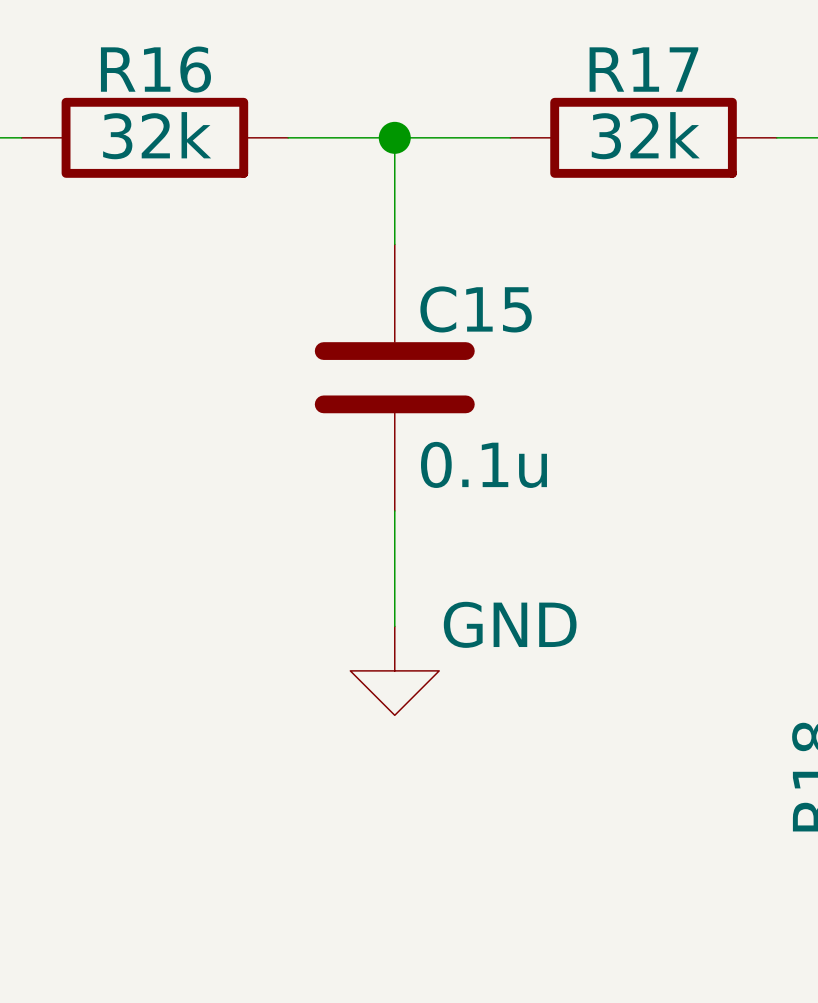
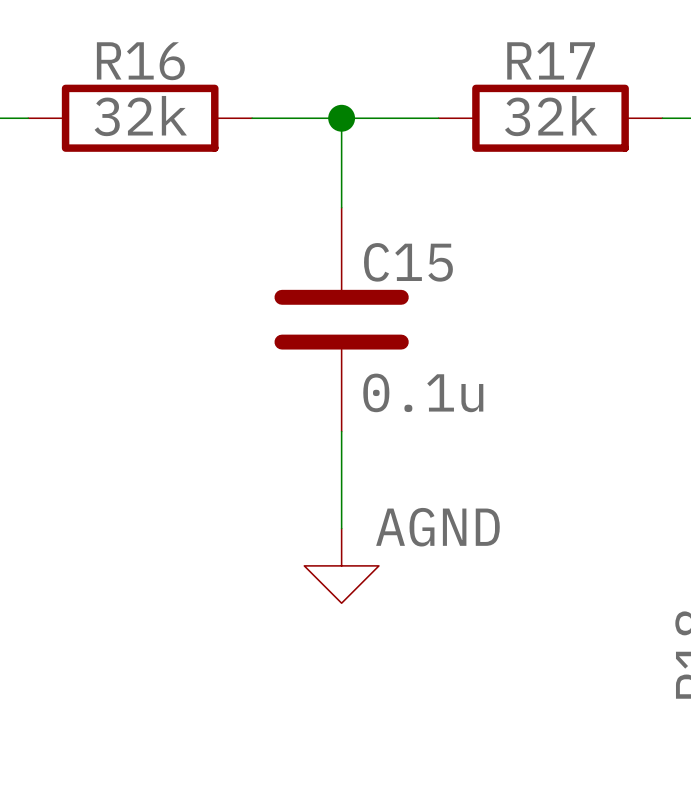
power symbol: GND (394, 670) -> AGND (341, 565)

